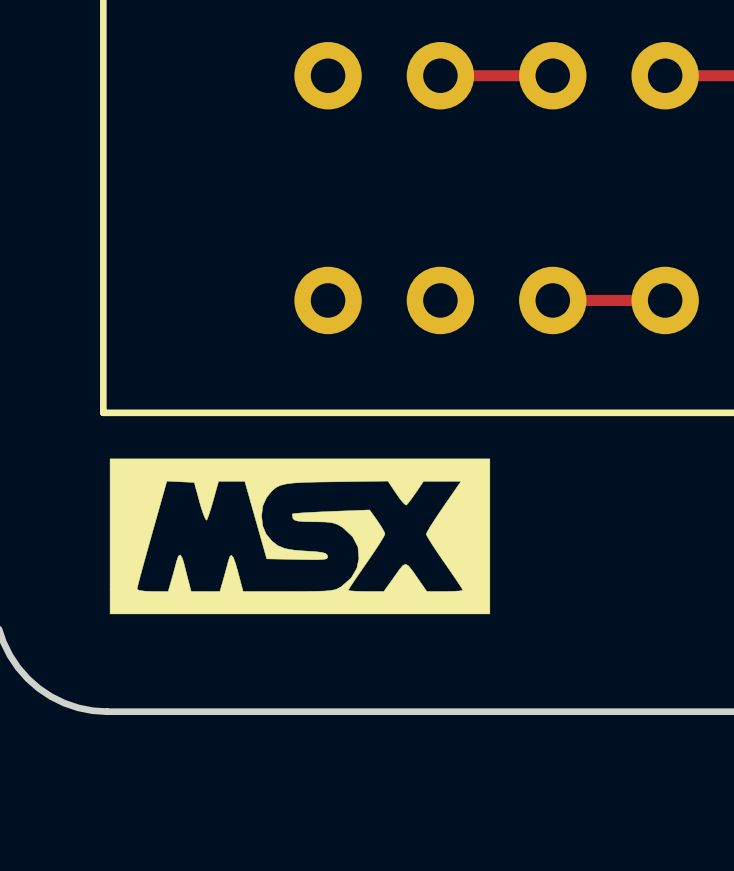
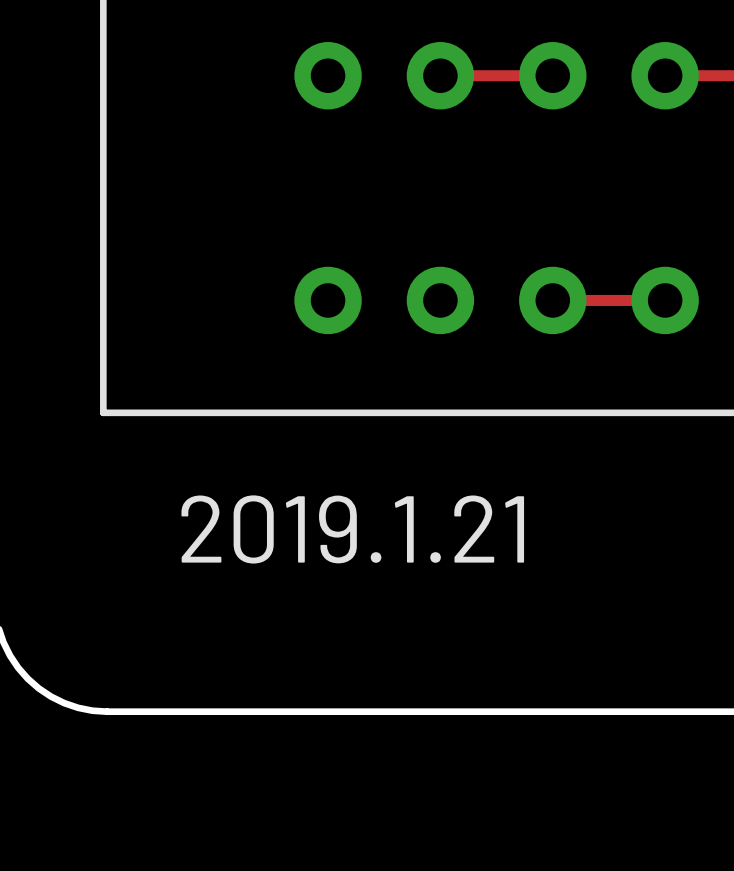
drawing: [109, 458, 491, 615] -> none
text: none -> 2019.1.21 (352, 529)

